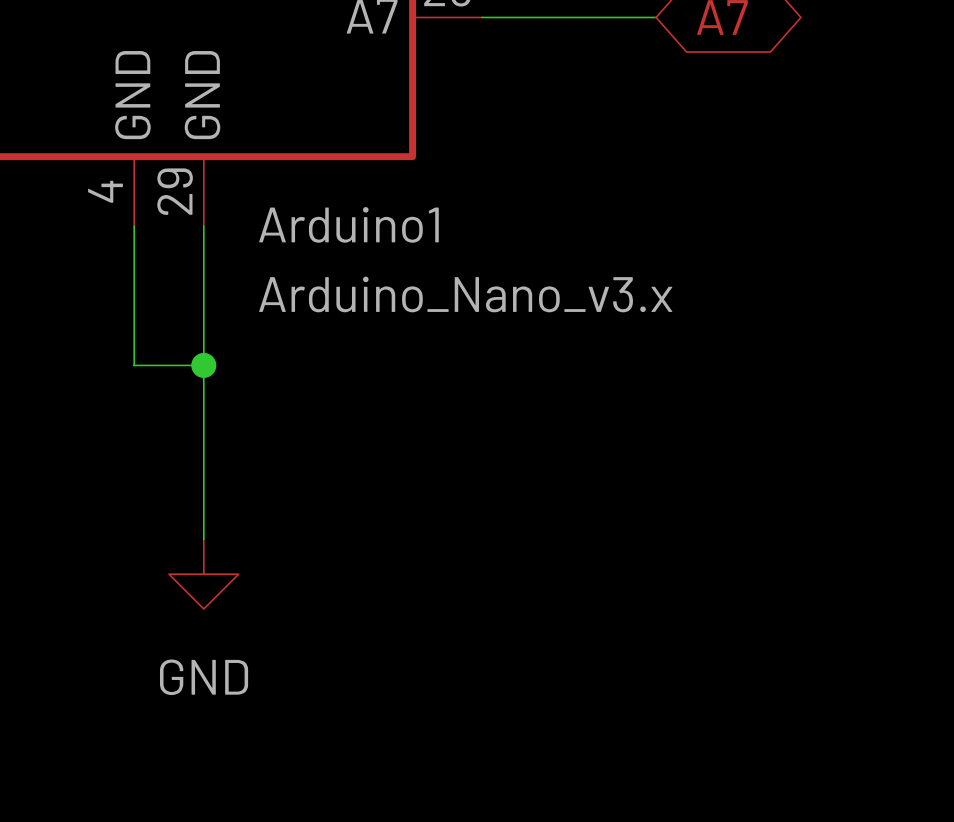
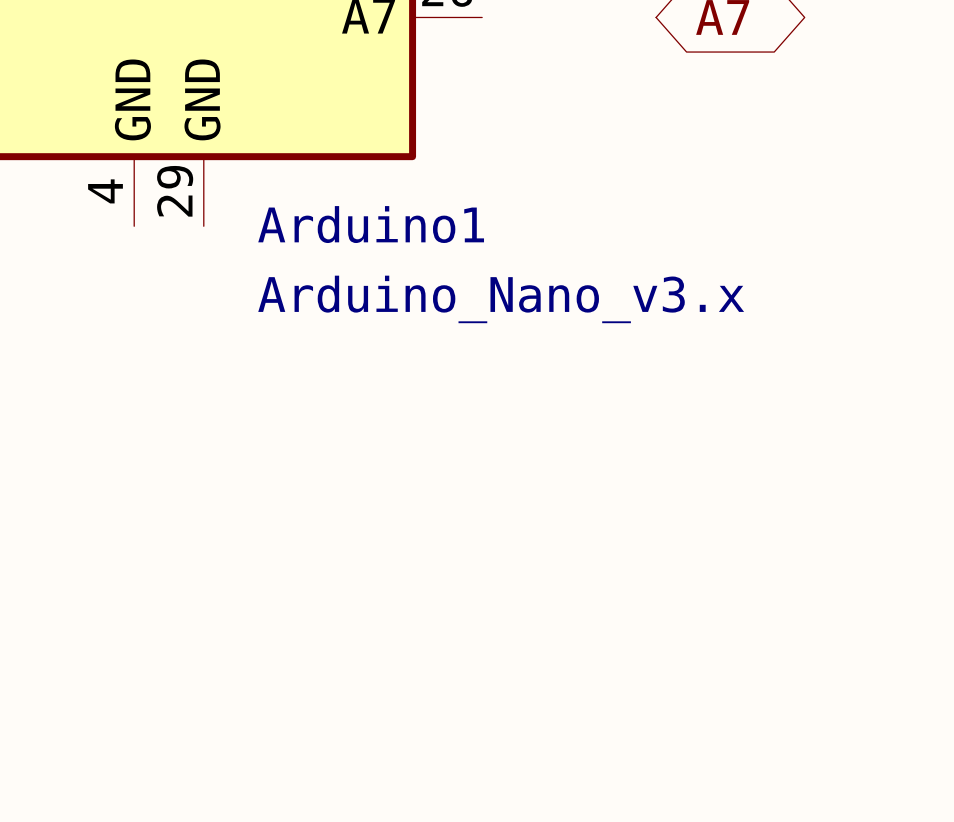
wire: (482, 17) (656, 17) -> none
wire: (134, 226) (134, 365) (203, 365) -> none
wire: (203, 226) (203, 539) -> none
junction: (203, 365) -> none
power symbol: GND (203, 574) -> none

